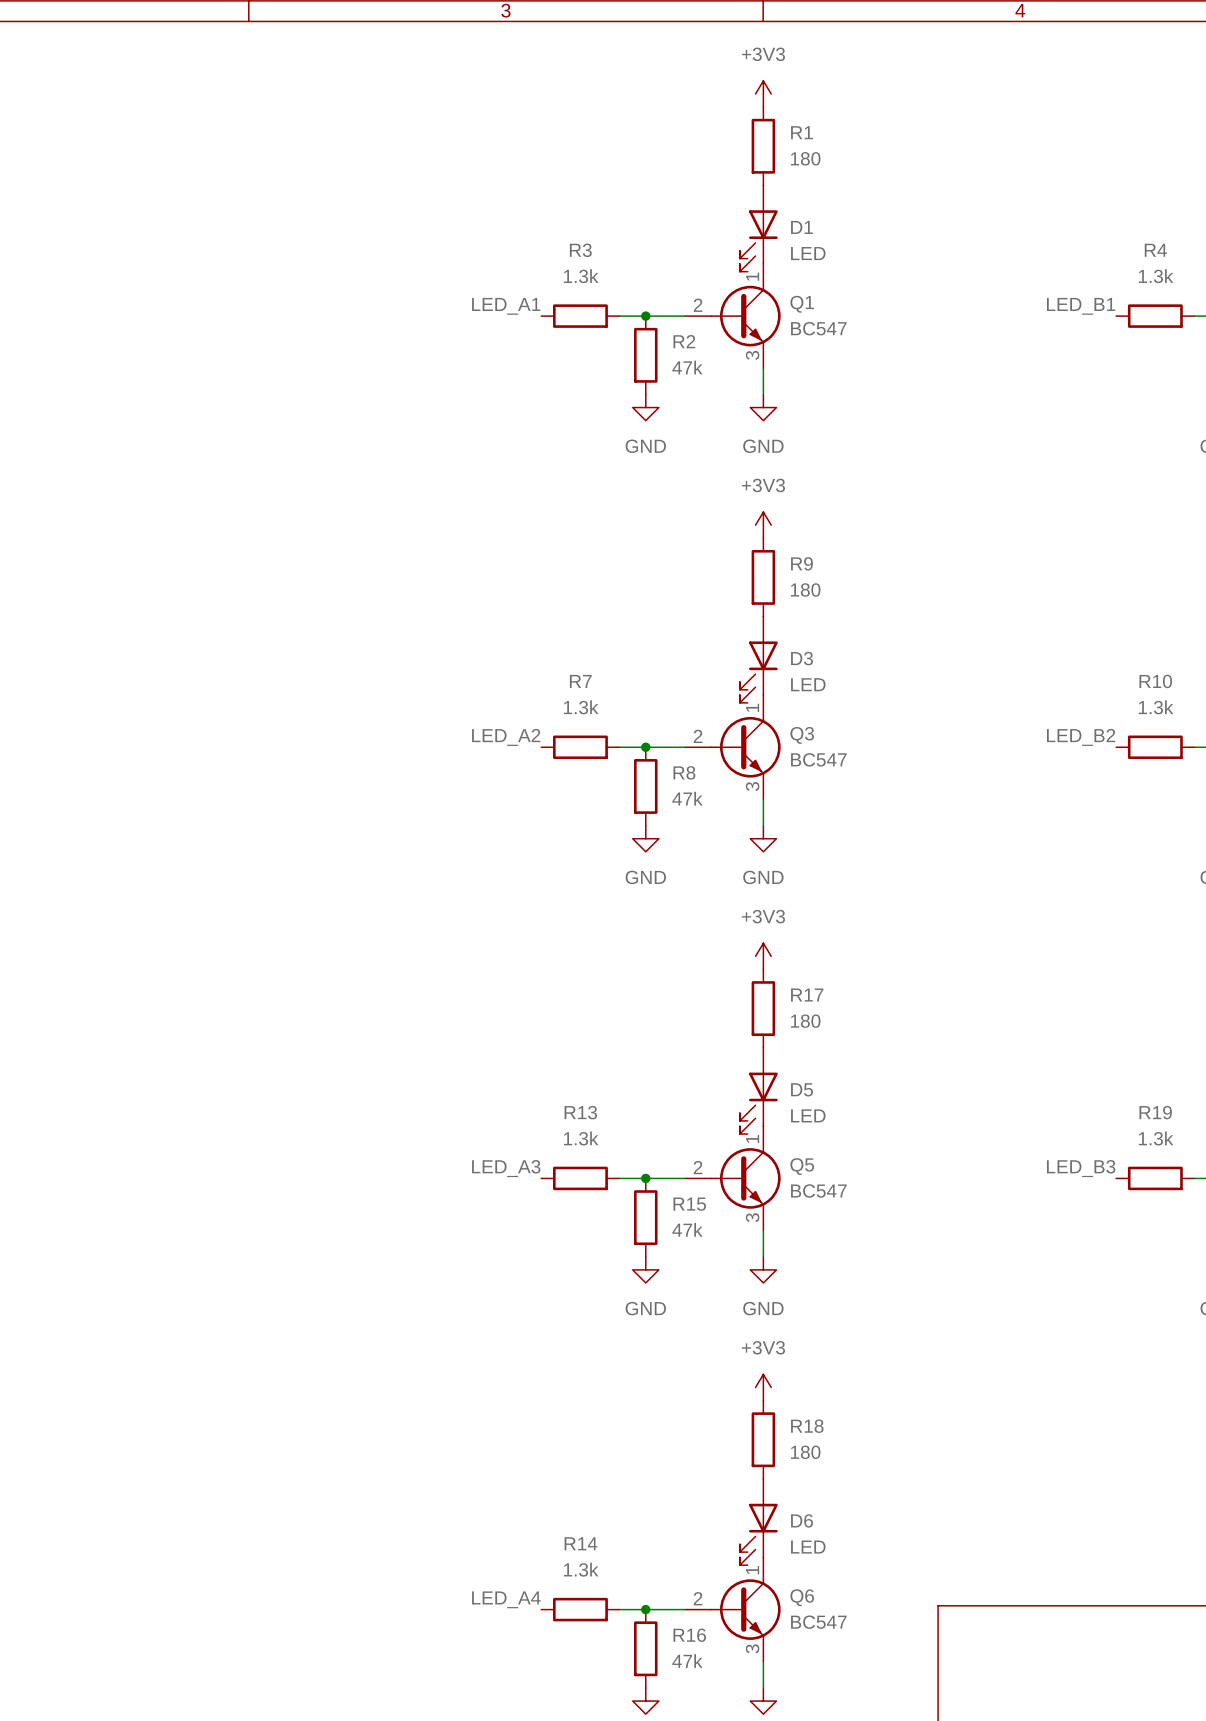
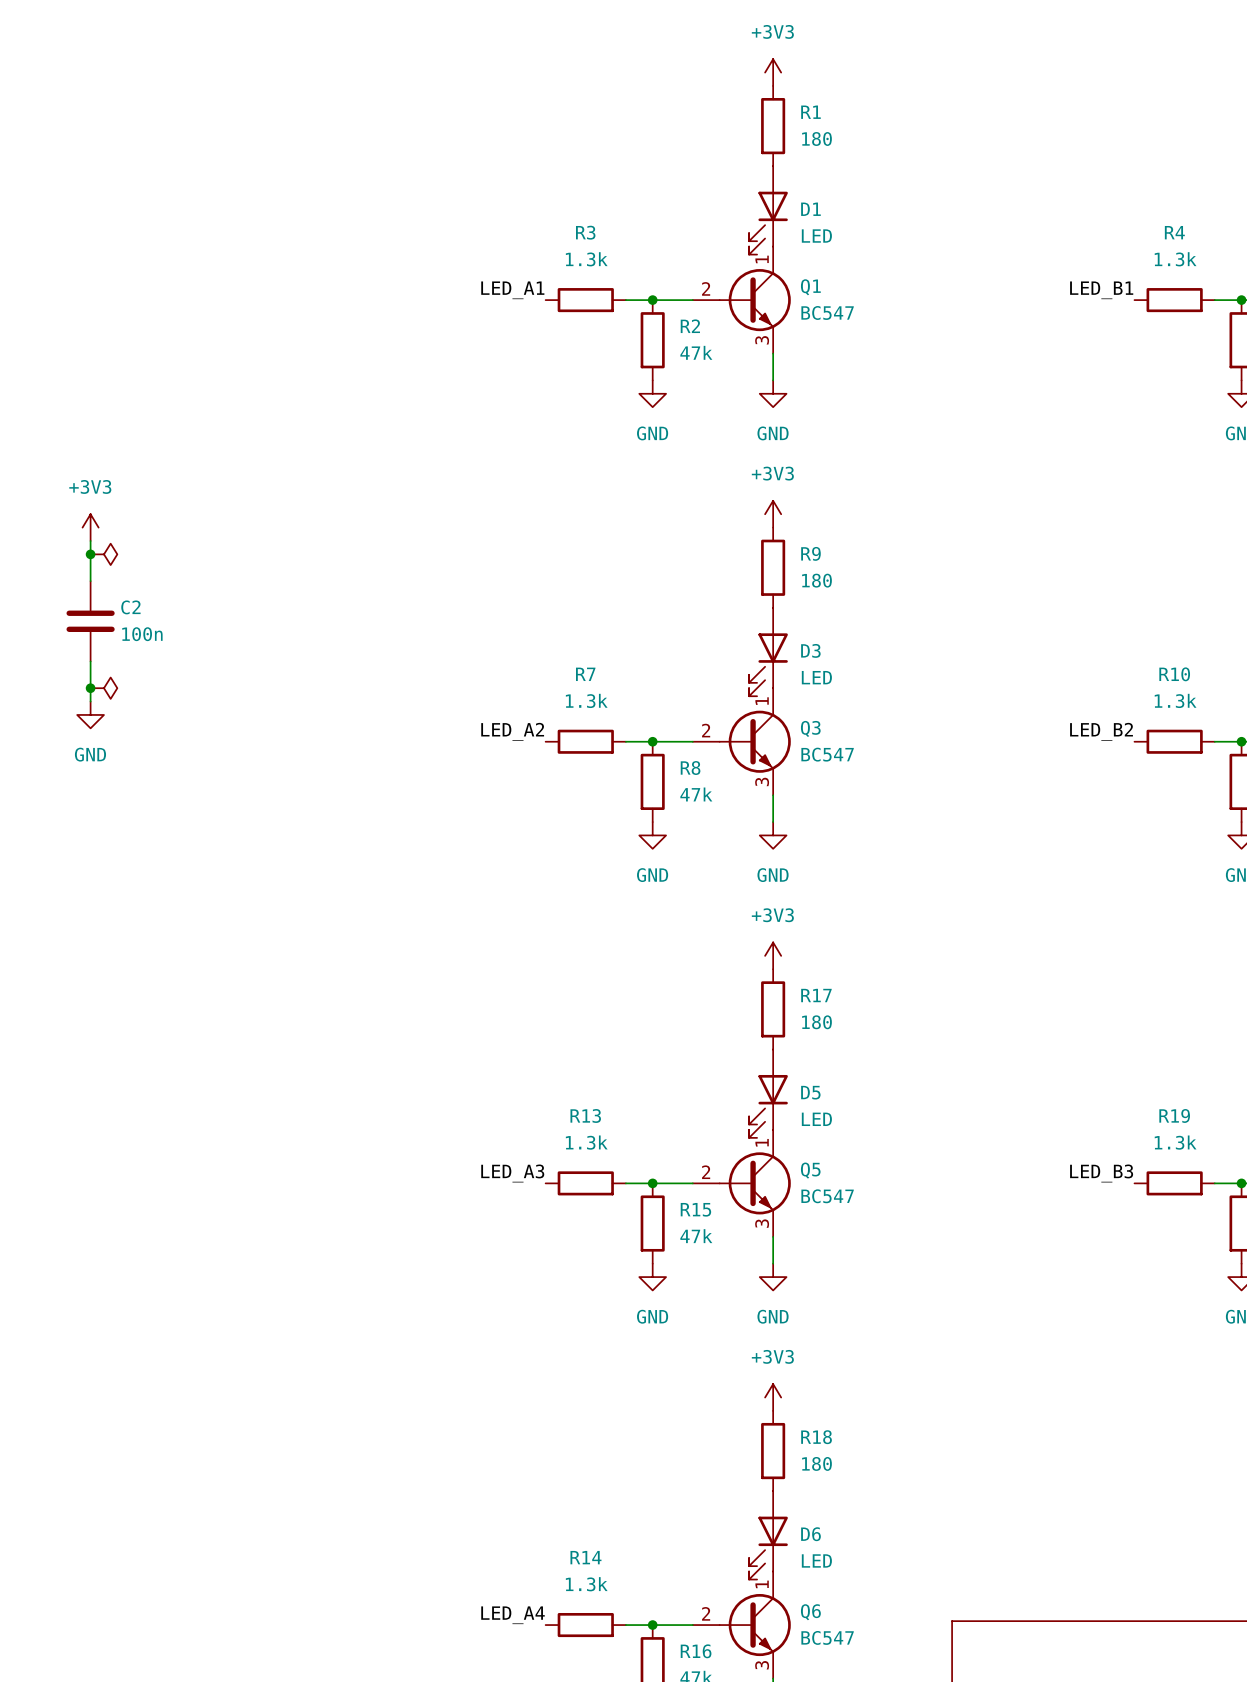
power symbol: none -> +3V3 (90, 527)
wire: none -> (90, 540) (90, 581)
junction: none -> (90, 554)
power symbol: none -> (103, 554)
C2: none -> 100n (90, 621)
wire: none -> (90, 661) (90, 701)
junction: none -> (90, 688)
power symbol: none -> (103, 688)
power symbol: none -> GND (90, 714)

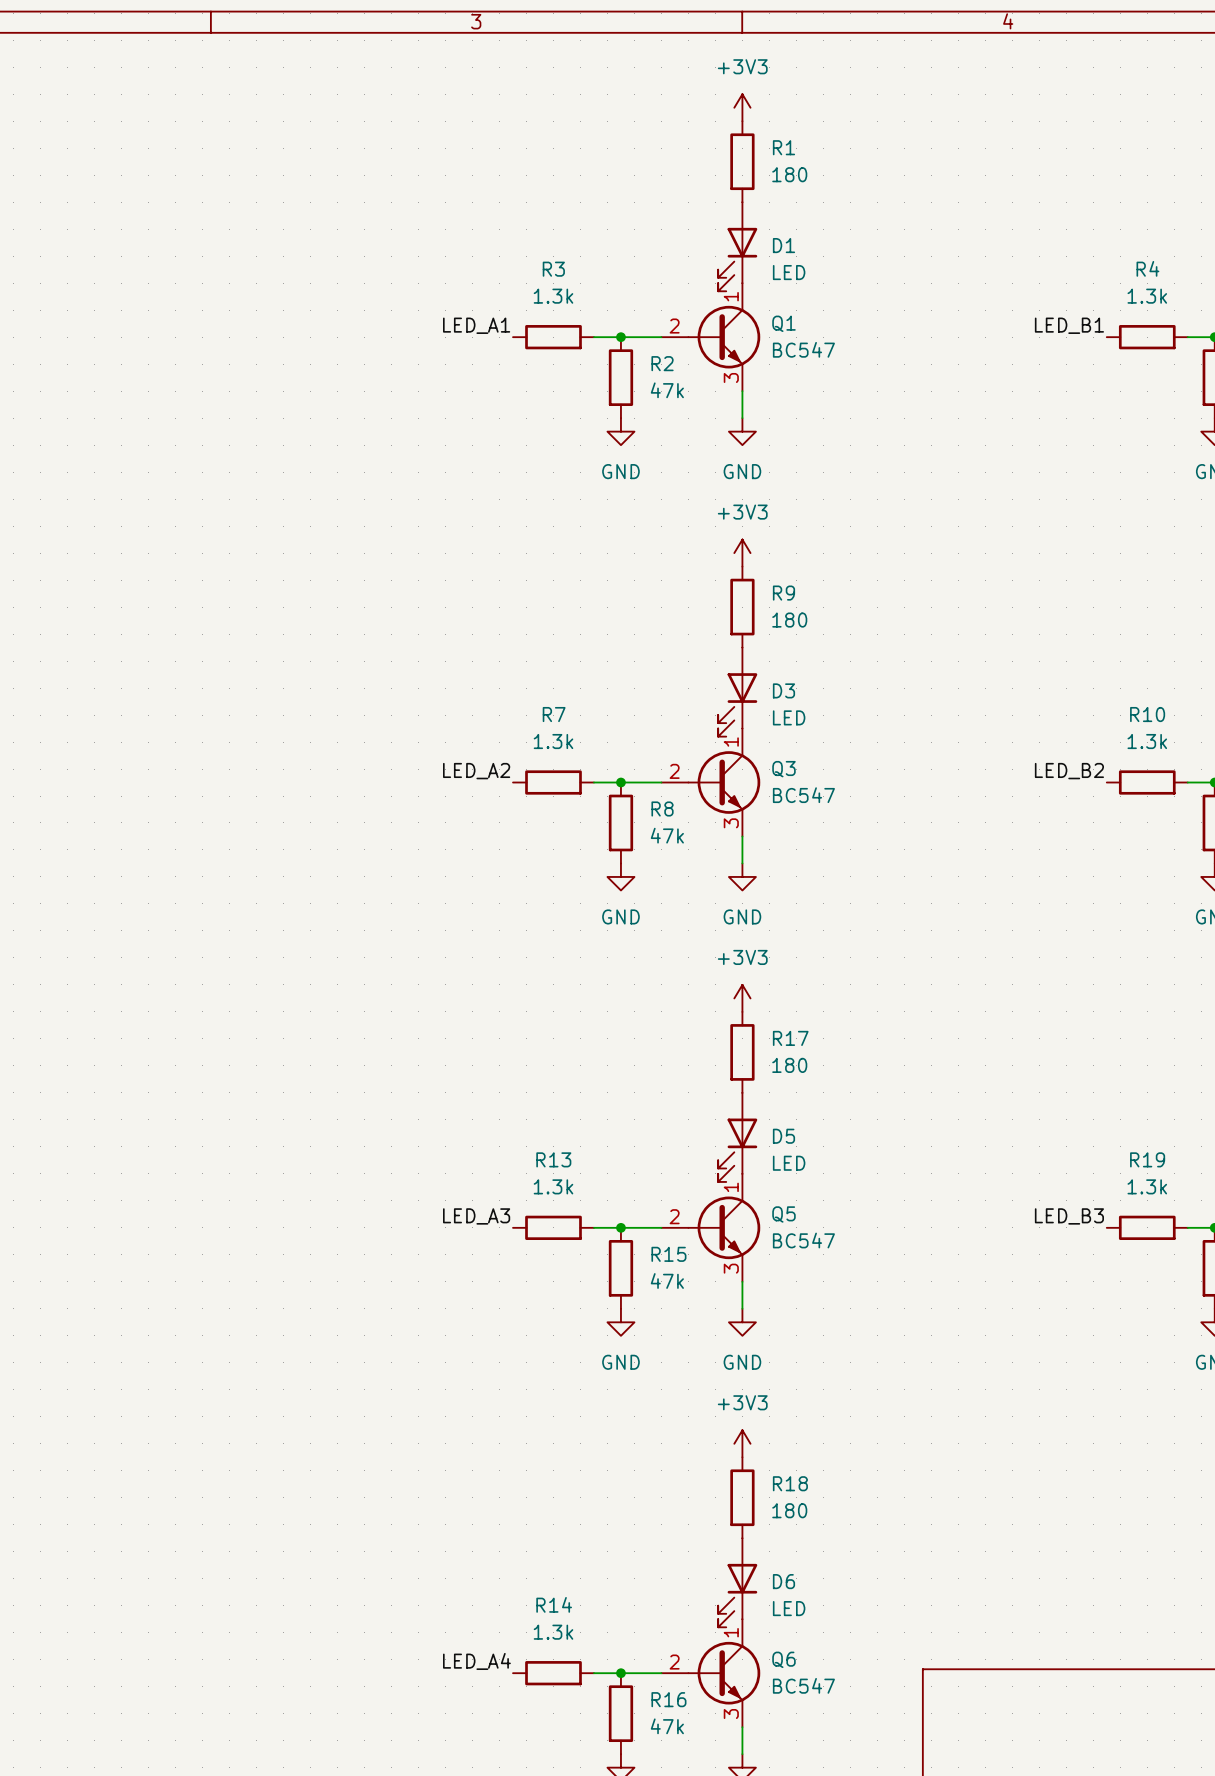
power symbol: +3V3 (90, 527) -> none
wire: (90, 540) (90, 581) -> none
junction: (90, 554) -> none
power symbol: (103, 554) -> none
C2: 100n (90, 621) -> none
wire: (90, 661) (90, 701) -> none
junction: (90, 688) -> none
power symbol: (103, 688) -> none
power symbol: GND (90, 714) -> none

